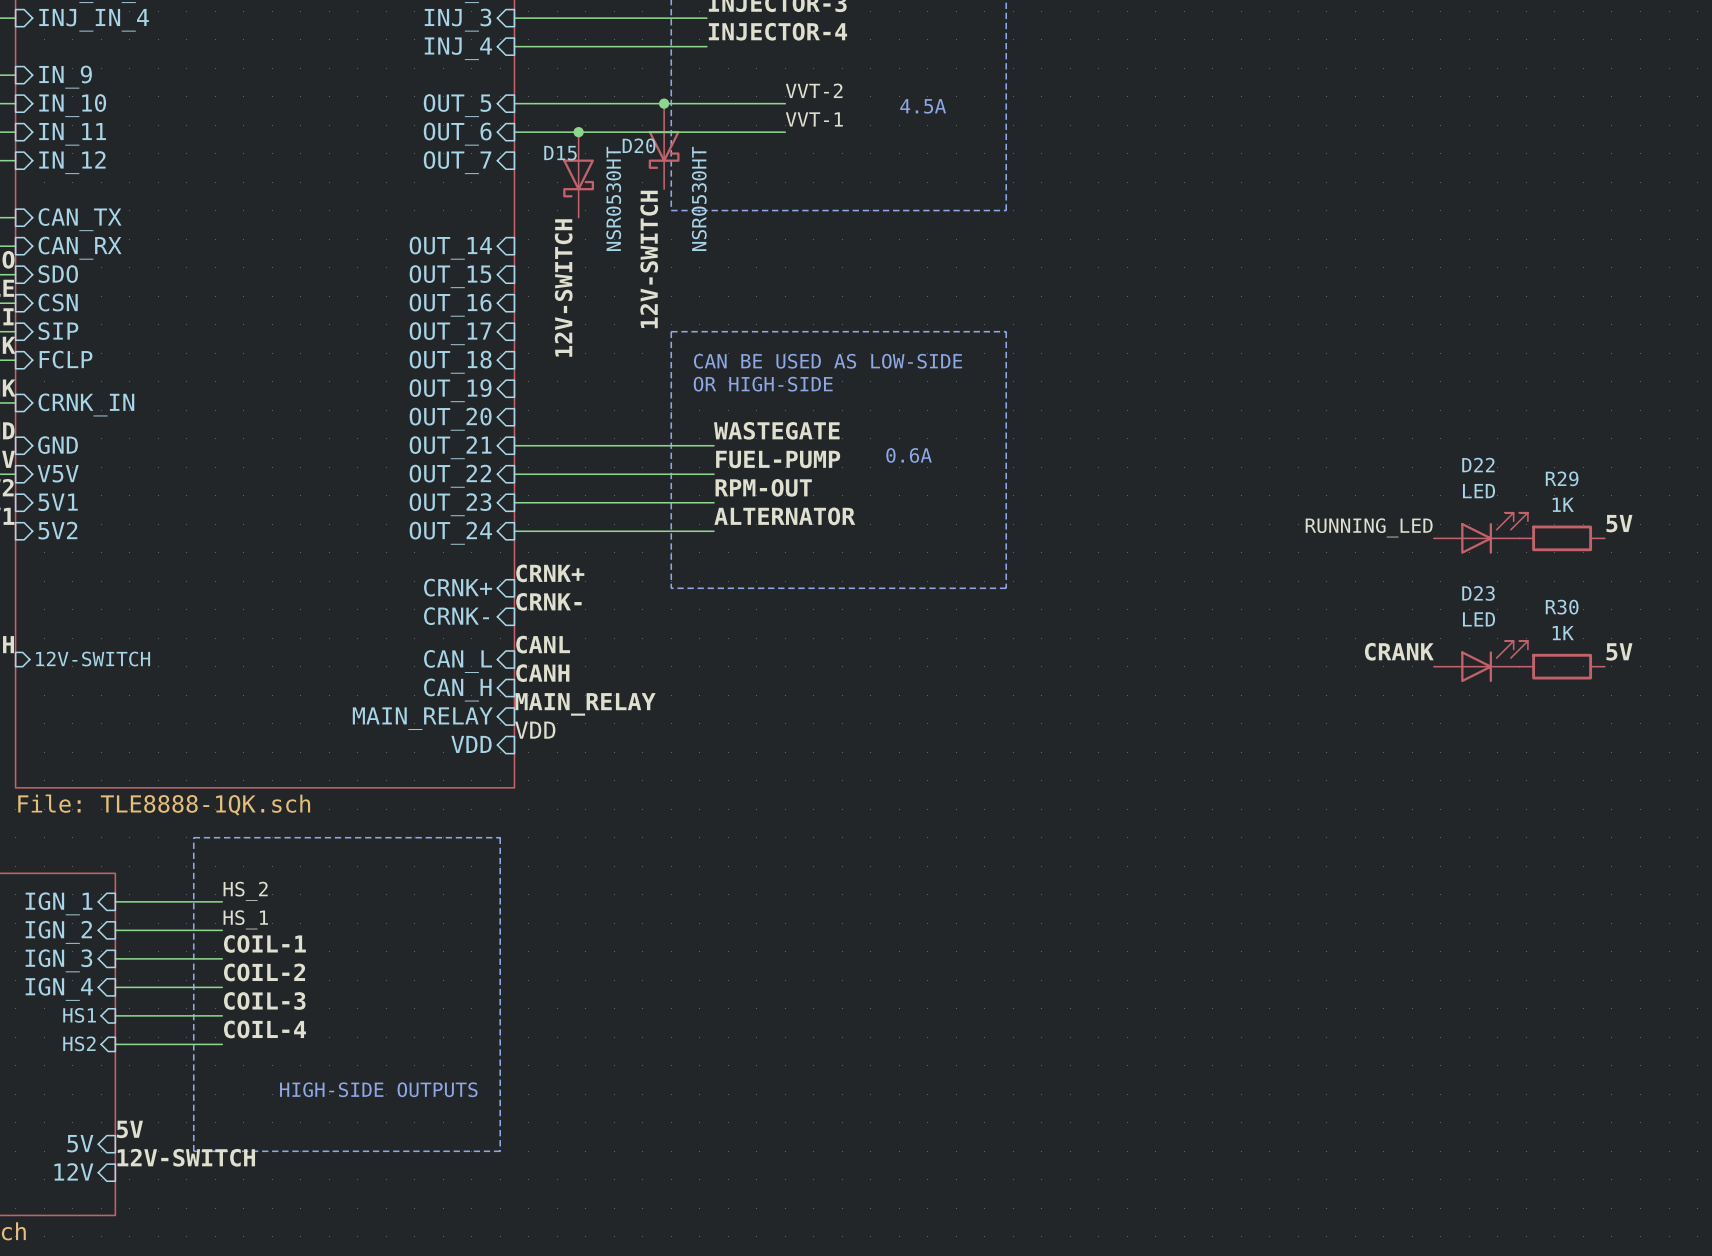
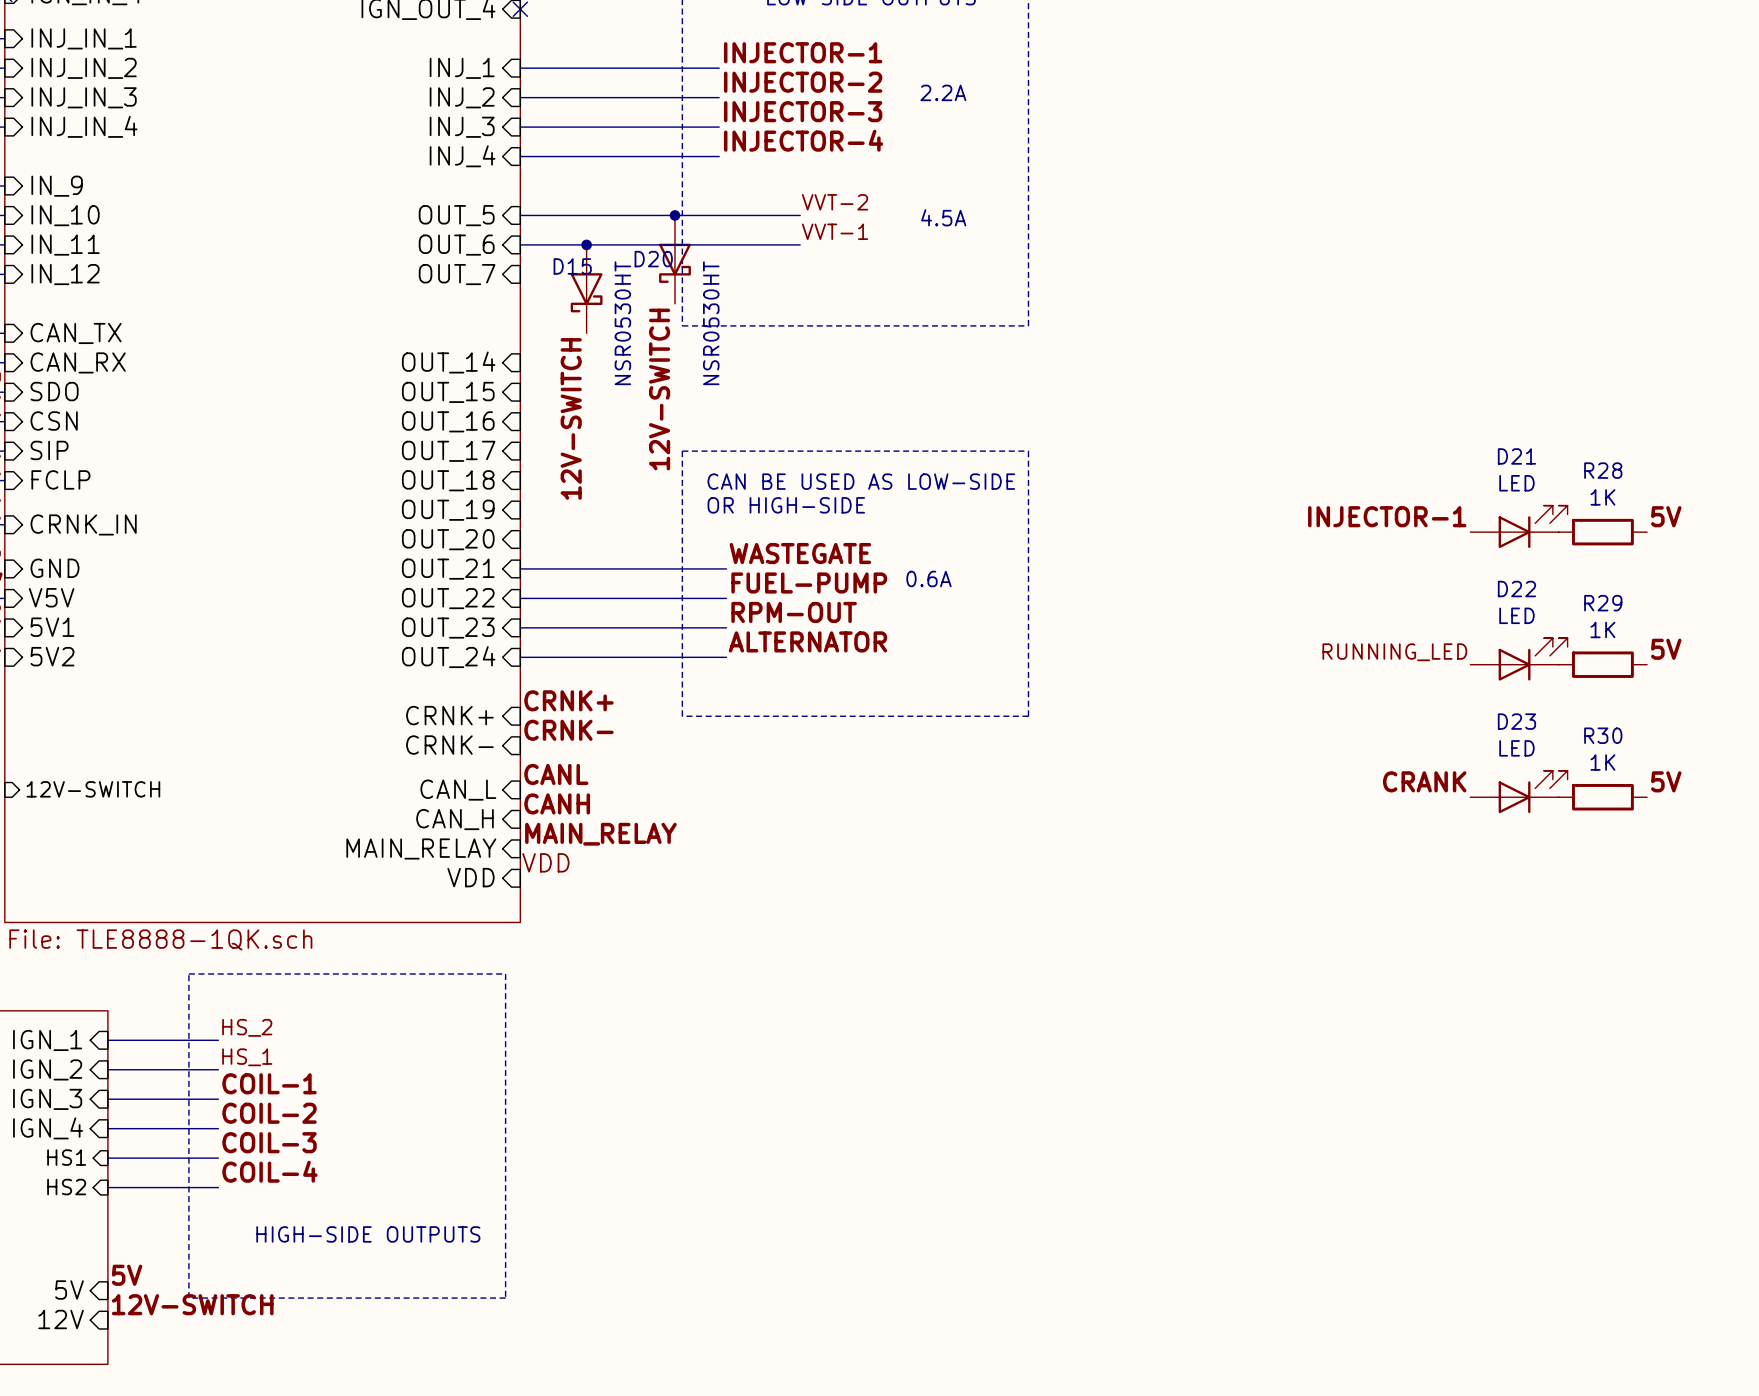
label: none -> INJECTOR-1 (1387, 516)
label: none -> 5V (1666, 516)
D21: none -> LED (1518, 526)
R28: none -> 1K (1602, 532)

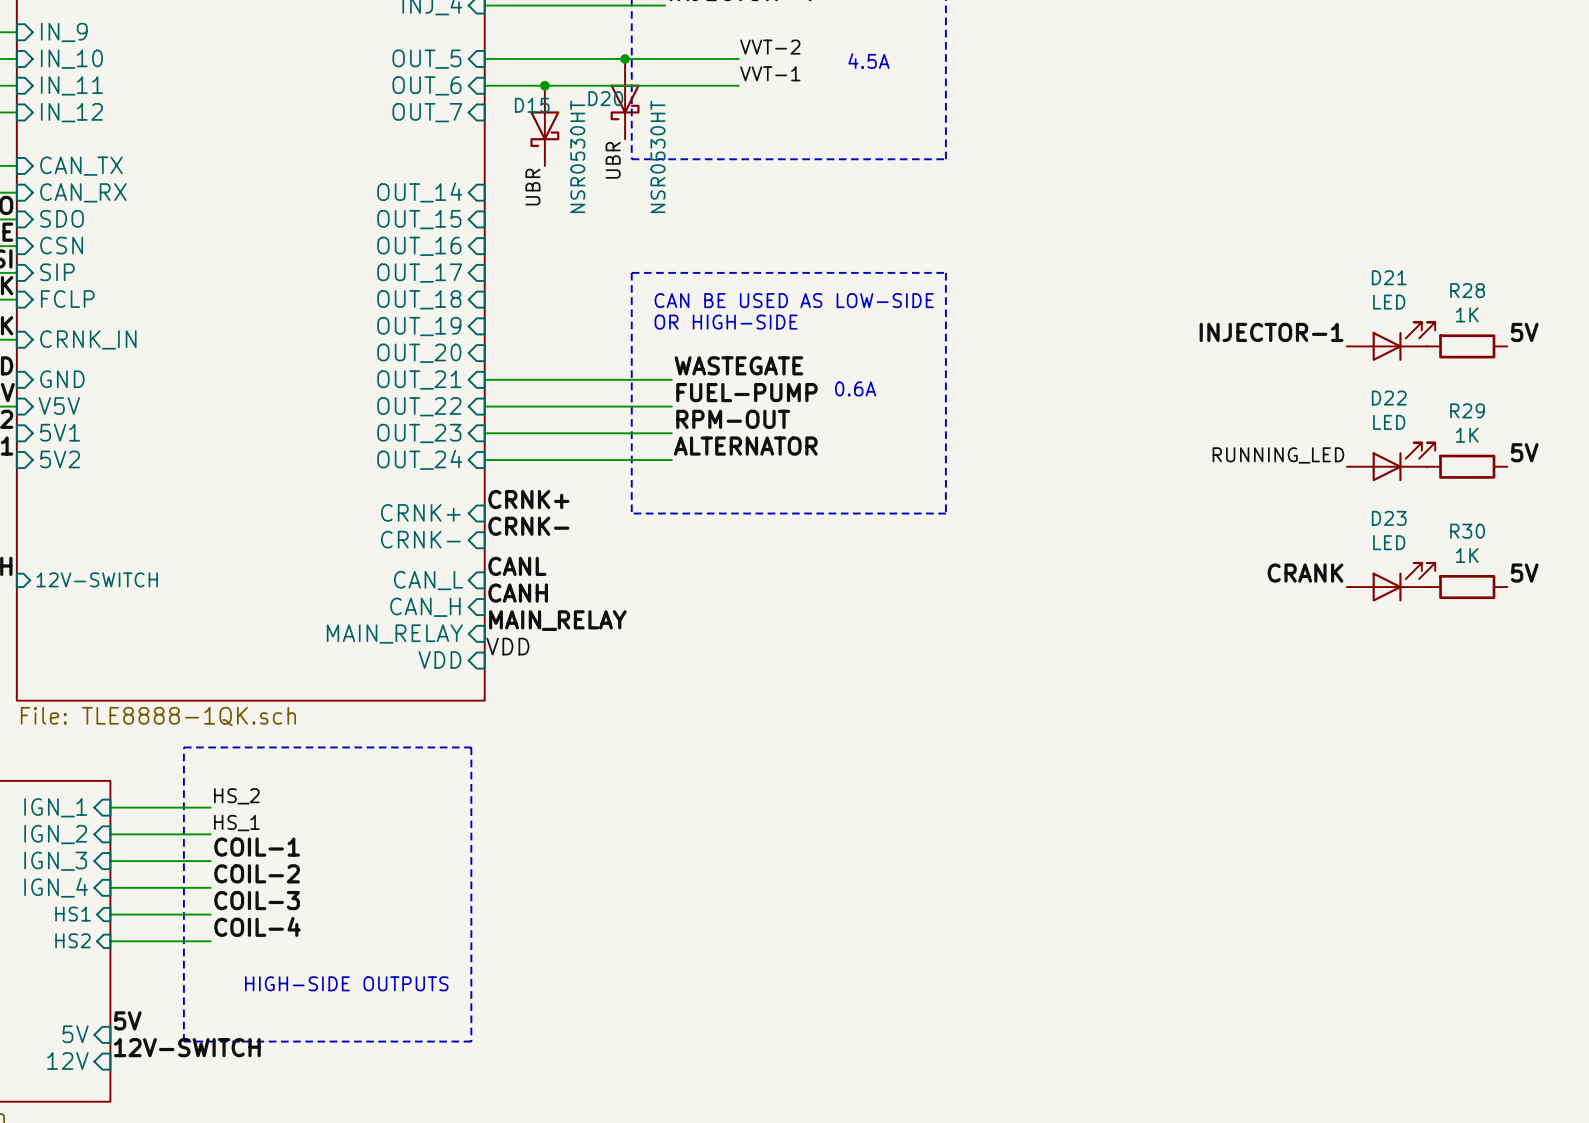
label: 12V-SWITCH (659, 389) -> UBR (613, 160)
label: 12V-SWITCH (571, 418) -> UBR (532, 187)

